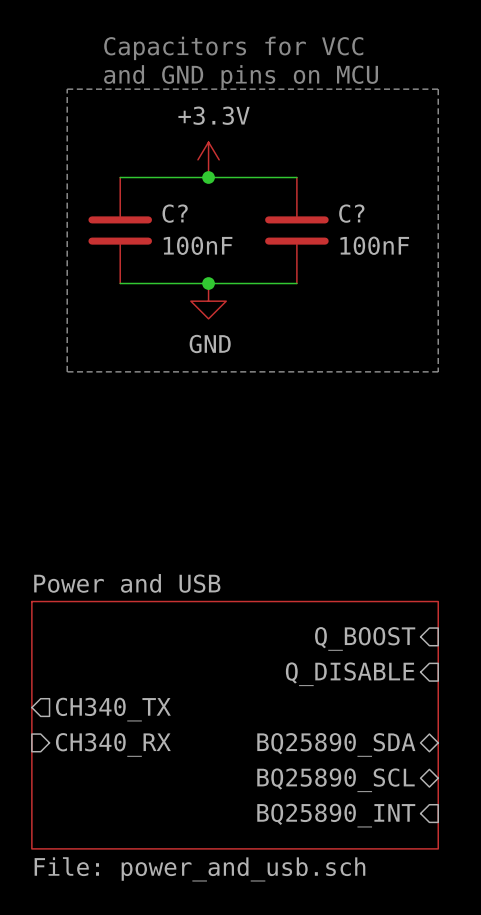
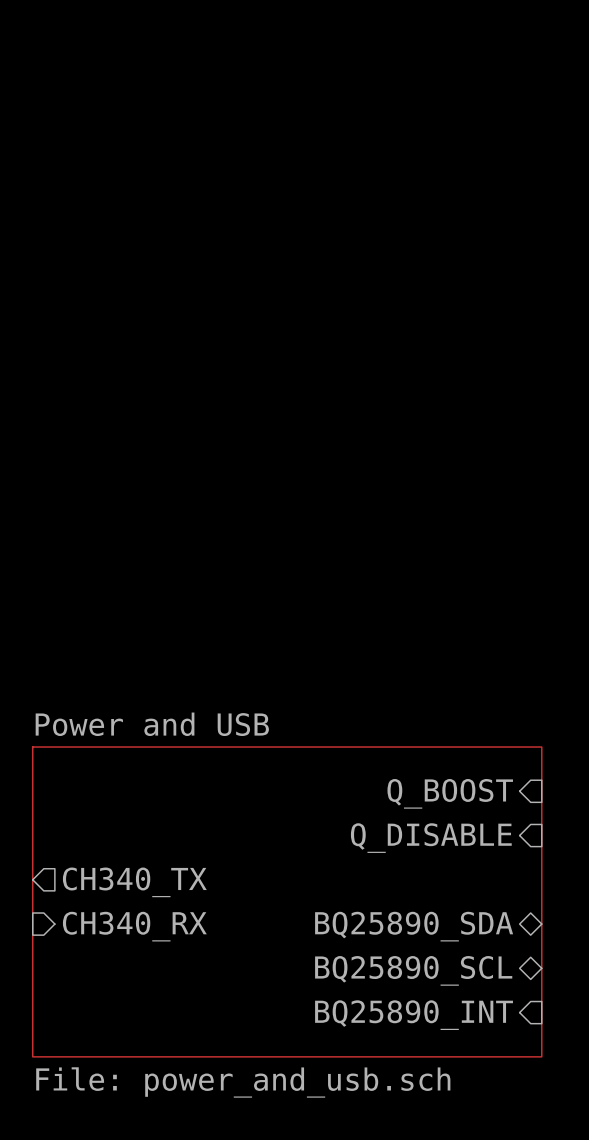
text: Capacitors for VCC (233, 48) -> none
text: and GND pins on MCU (241, 76) -> none
line: (67, 89) (438, 89) (438, 371) (67, 371) (67, 89) -> none
power symbol: +3.3V (208, 159) -> none
wire: (120, 177) (296, 177) -> none
junction: (208, 177) -> none
C?: 100nF (120, 230) -> none
C?: 100nF (296, 230) -> none
wire: (120, 283) (296, 283) -> none
junction: (208, 283) -> none
power symbol: GND (208, 301) -> none

